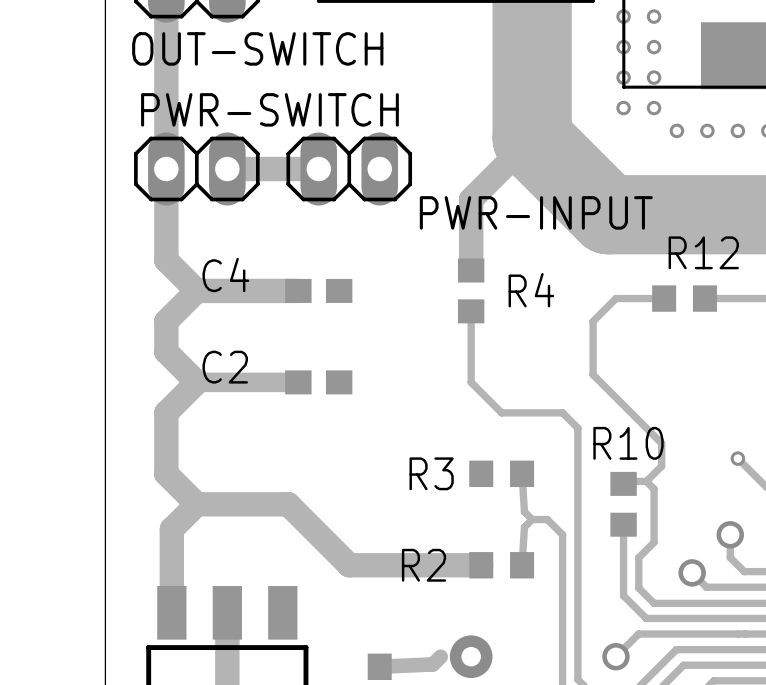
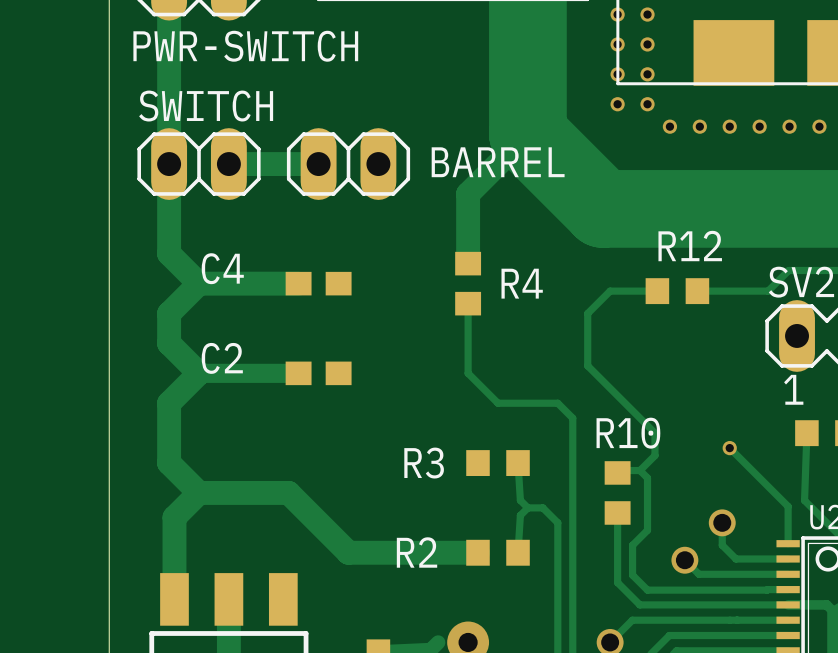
OUT-SWITCH name: OUT-SWITCH (257, 48) -> PWR-SWITCH (245, 46)
PWR-SWITCH name: PWR-SWITCH (269, 109) -> SWITCH (206, 106)
PWR-INPUT name: PWR-INPUT (536, 212) -> BARREL (498, 162)

